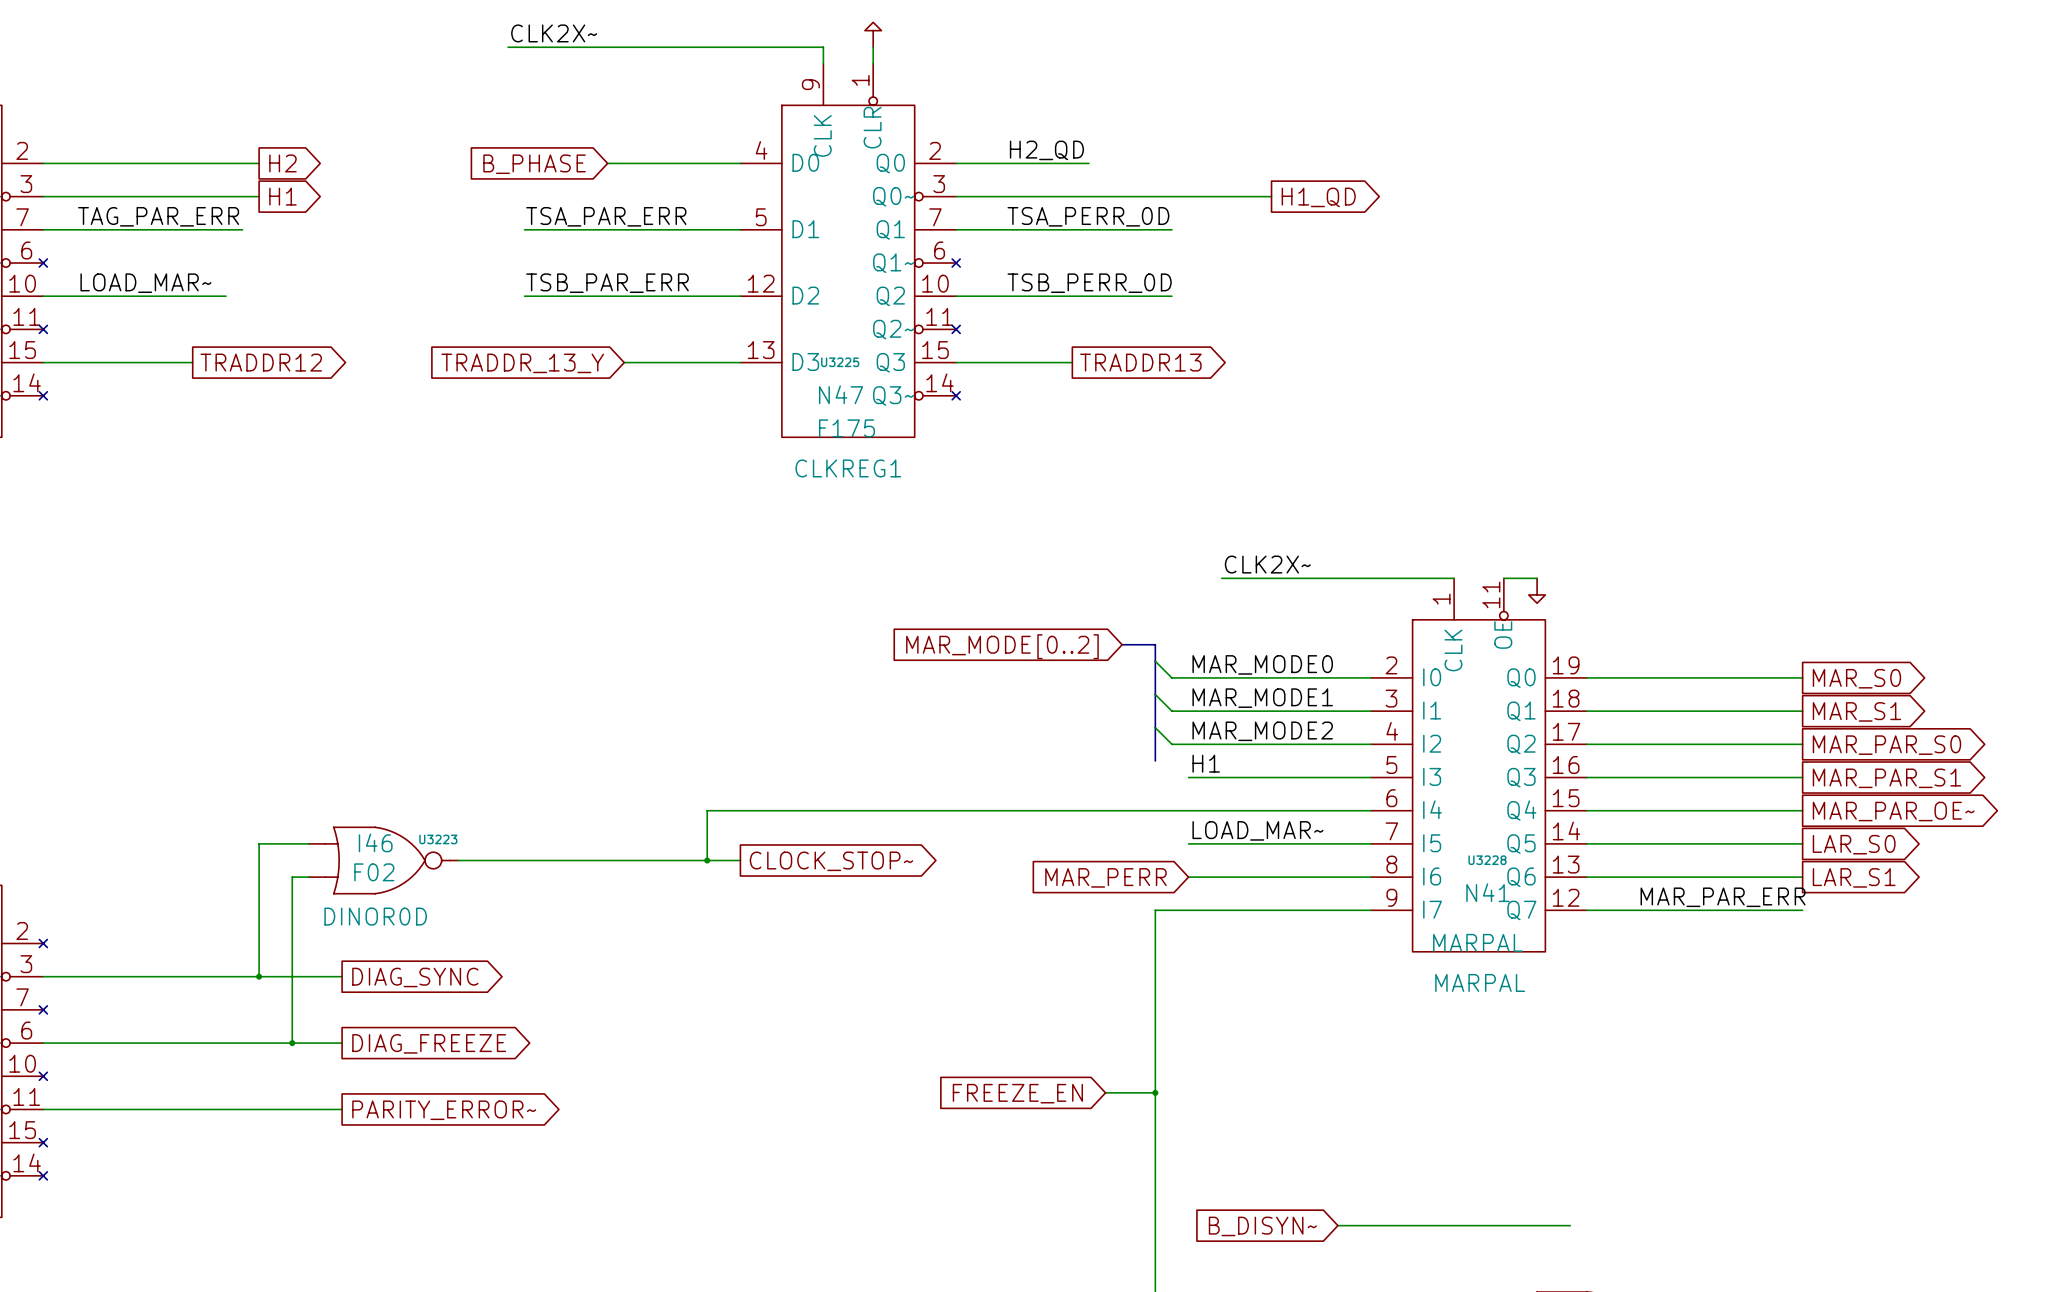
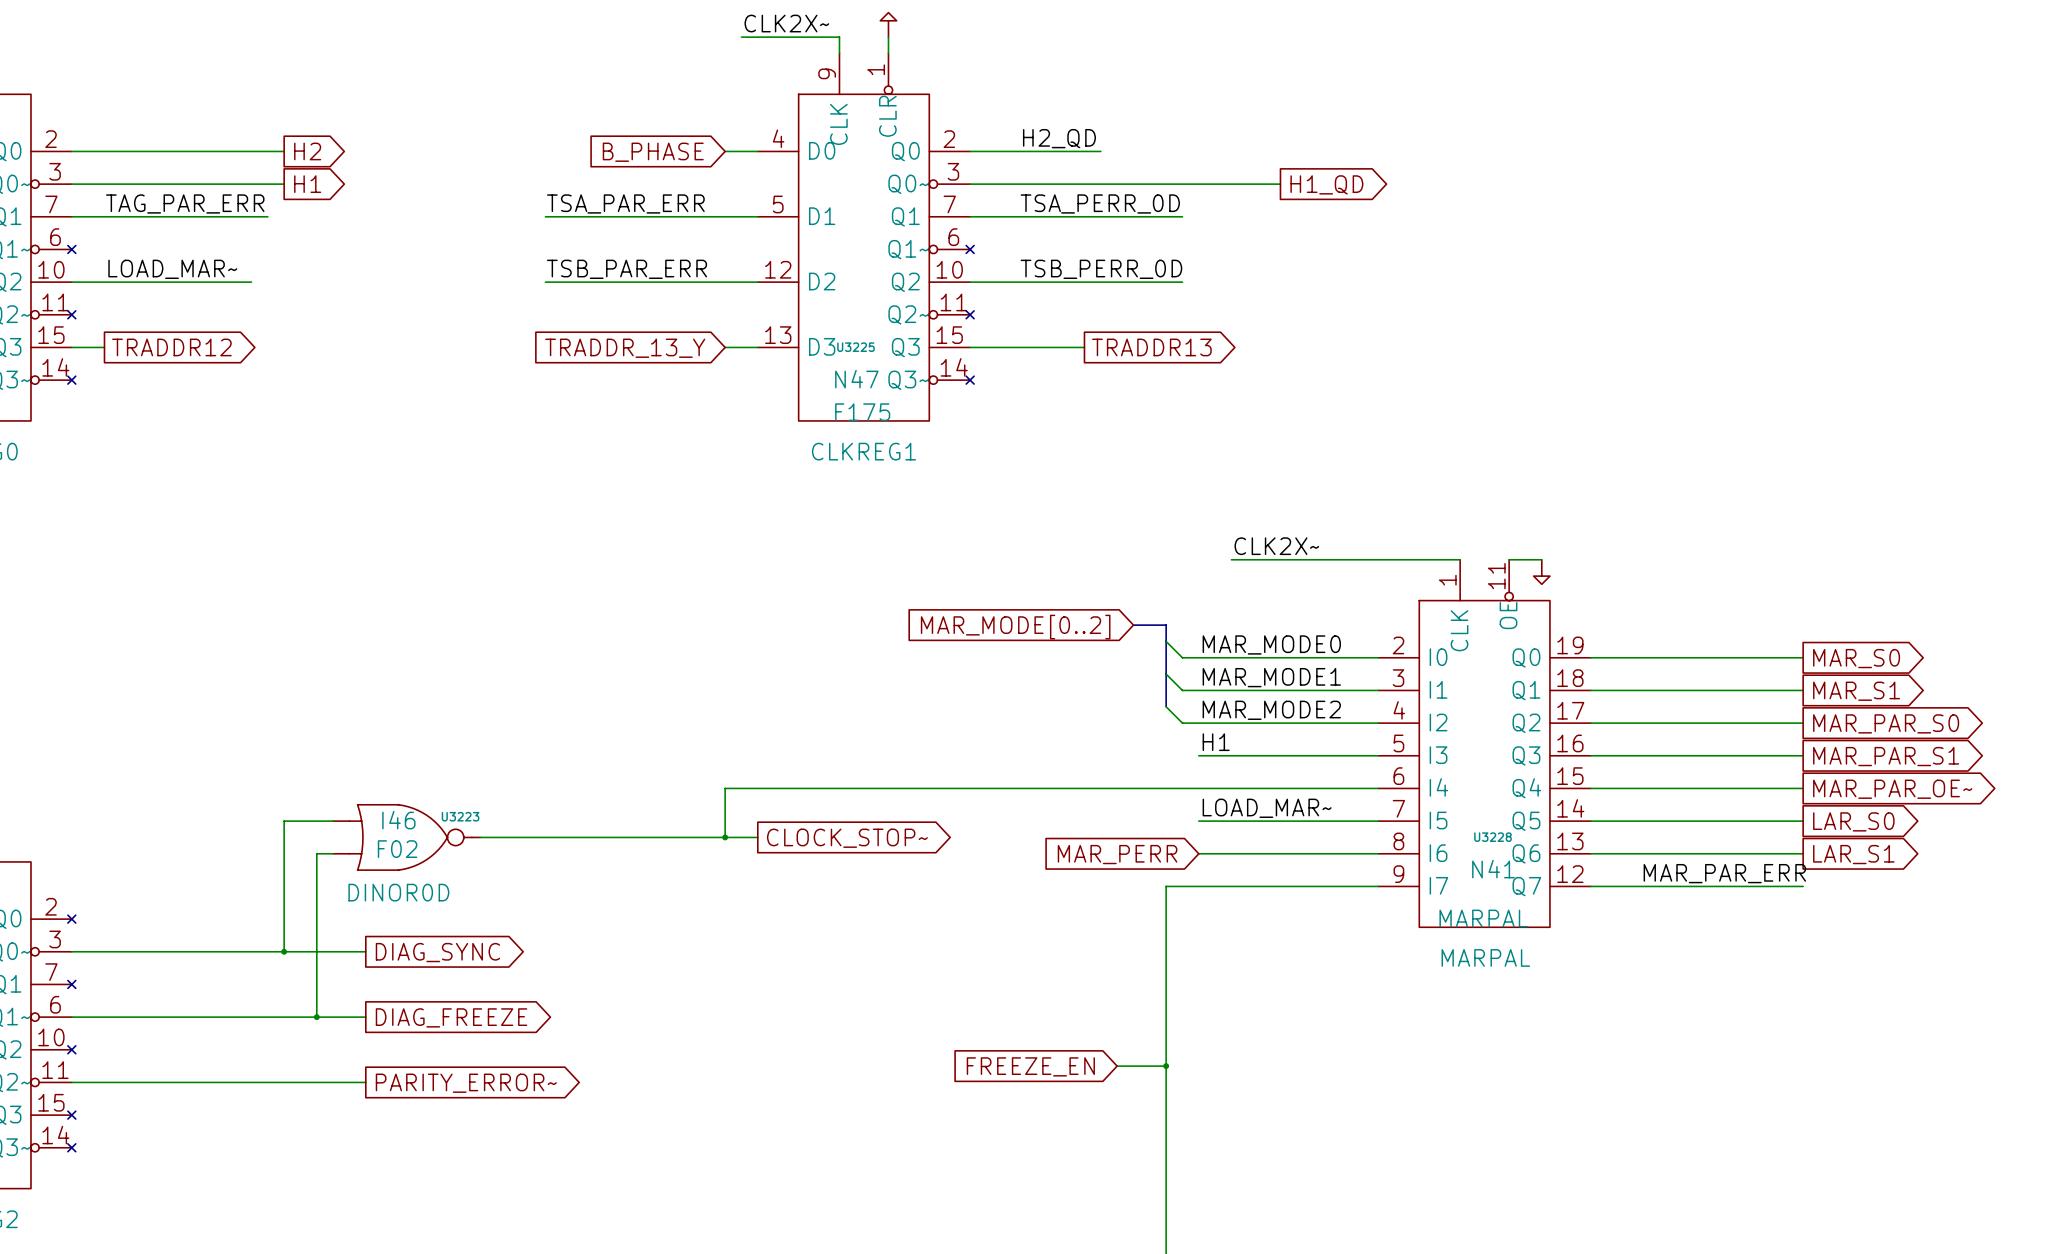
label: CLK2X~ (554, 33) -> none
label: none -> CLK2X~ (786, 23)
wire: (508, 47) (723, 47) -> none
wire: (607, 163) (707, 163) -> none
global label position: B_PHASE (534, 164) -> B_PHASE (653, 152)
wire: (76, 362) (192, 362) -> none
global label position: TRADDR12 (261, 362) -> TRADDR12 (171, 347)
wire: (624, 362) (707, 362) -> none
global label position: TRADDR_13_Y (522, 363) -> TRADDR_13_Y (625, 348)
bus: (1155, 727) (1155, 760) -> none
wire: (1337, 1225) (1570, 1225) -> none
global label: B_DISYN~ (1262, 1226) -> none

